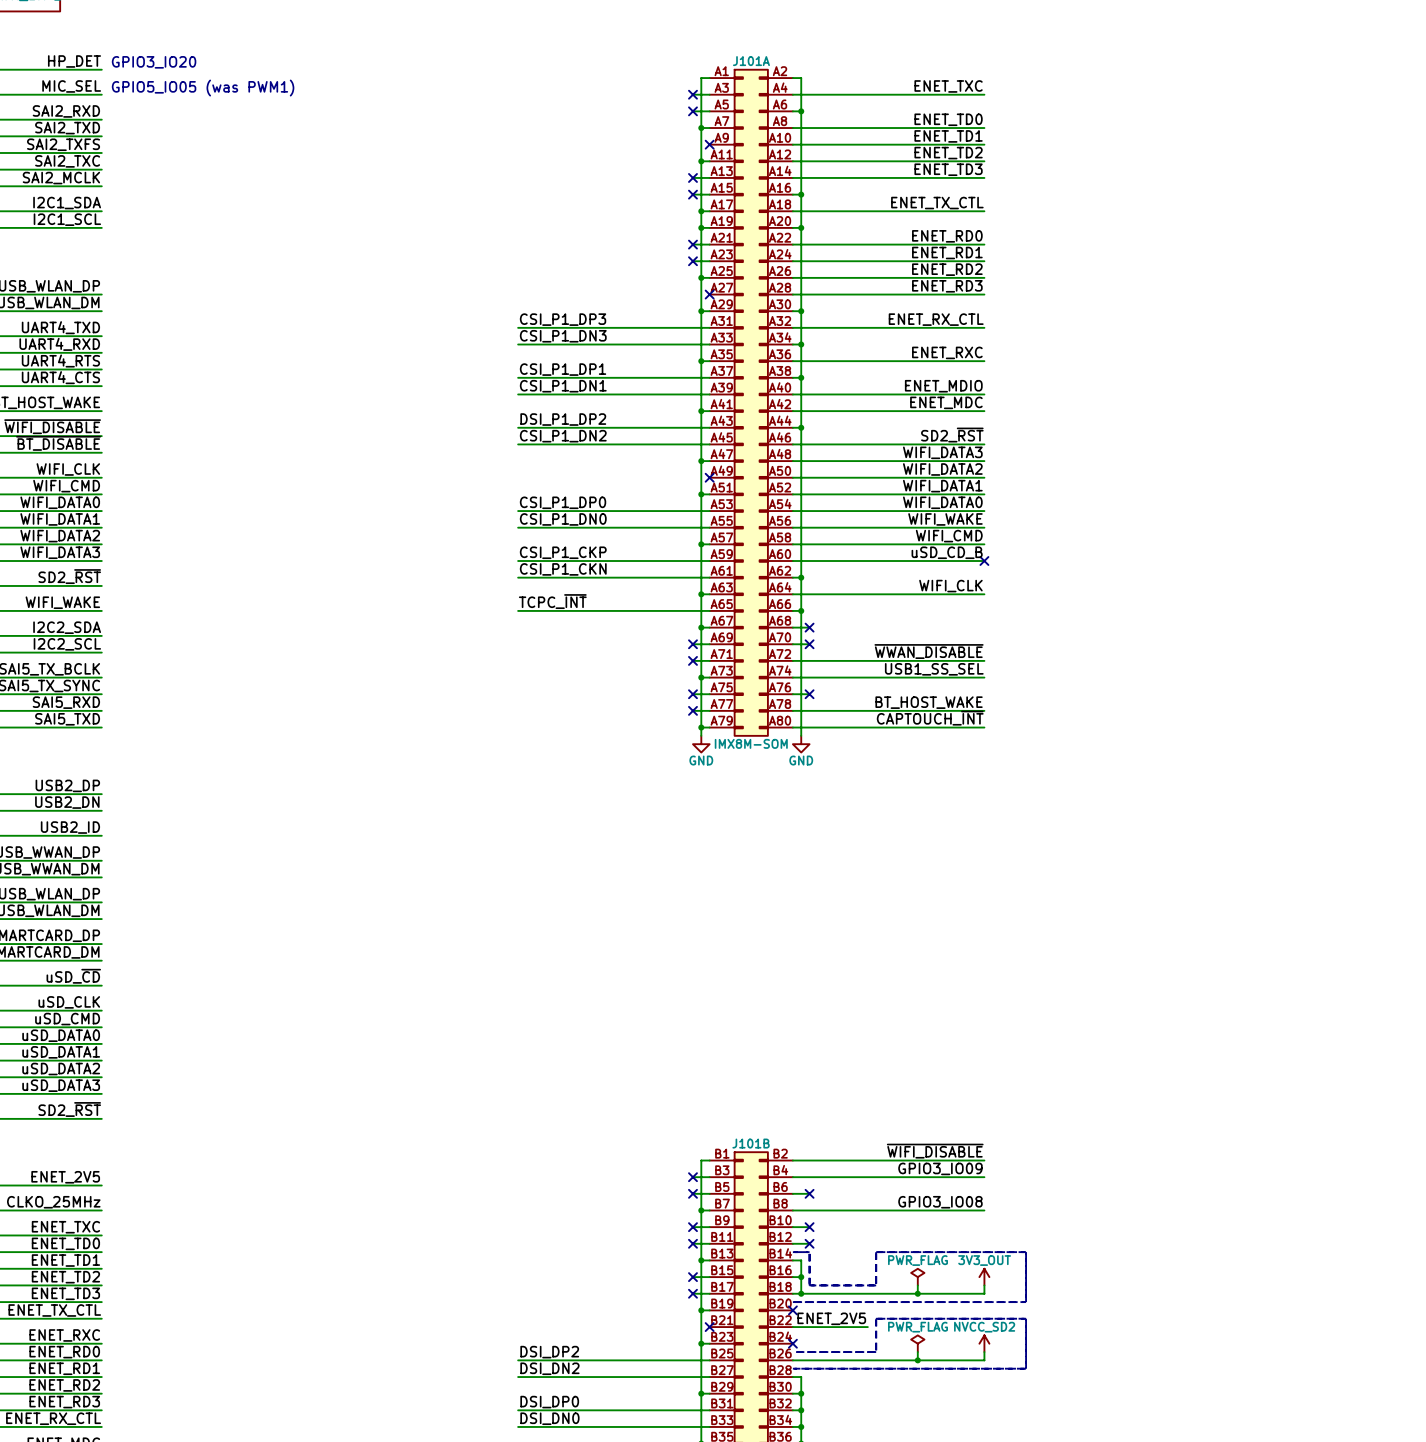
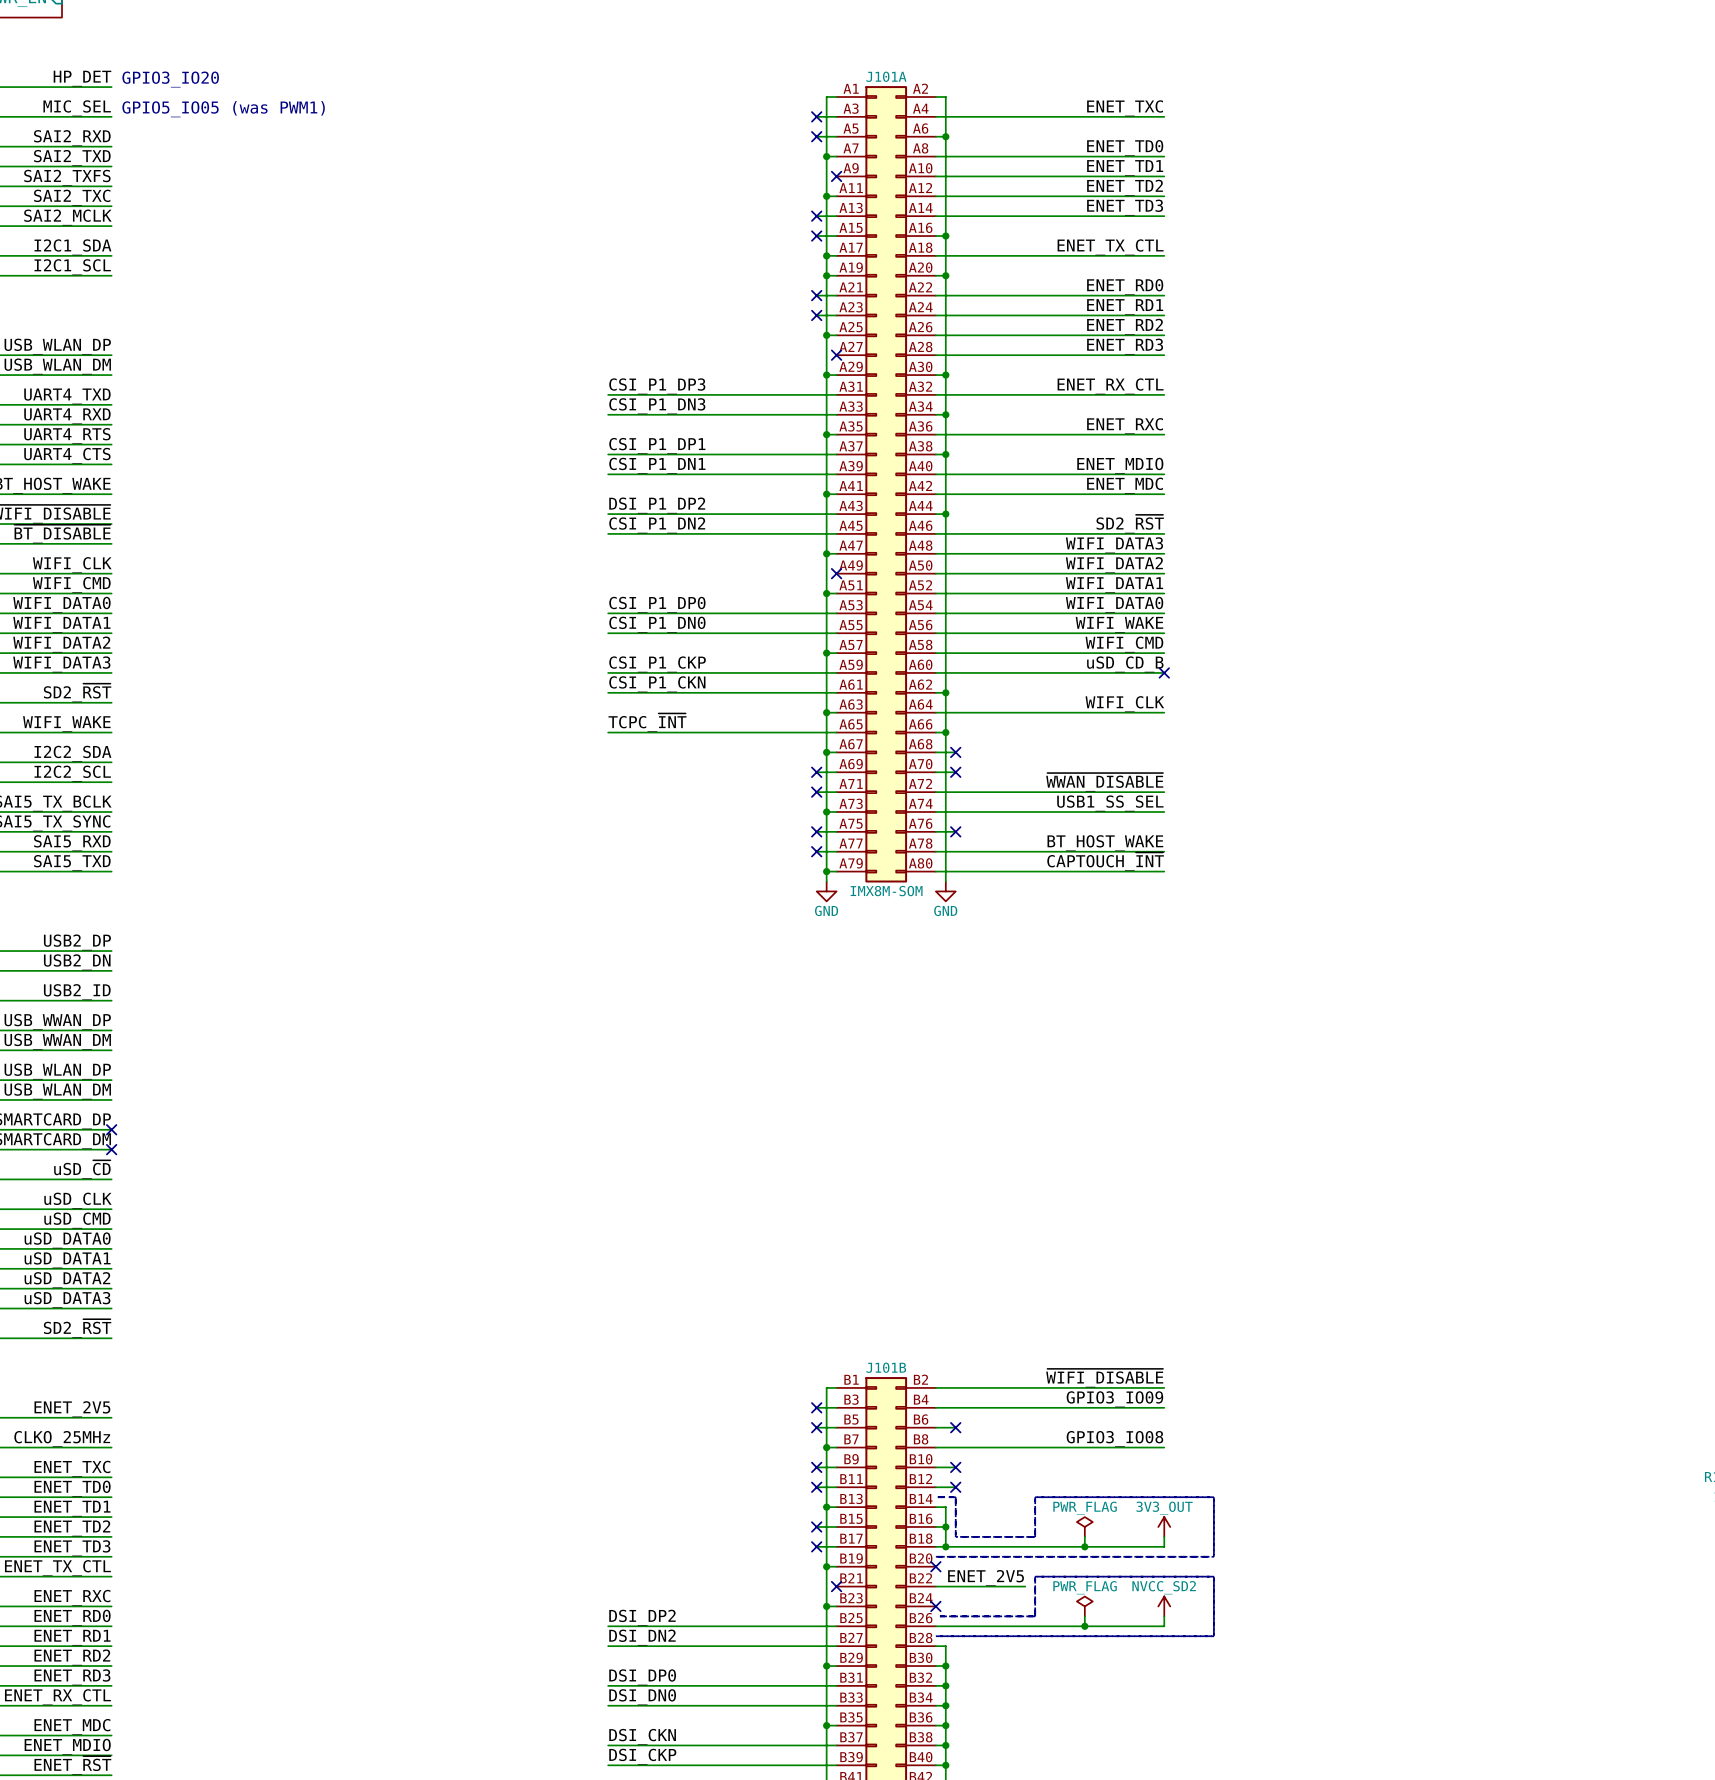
no-connect mark: none -> (111, 1129)
no-connect mark: none -> (111, 1149)

